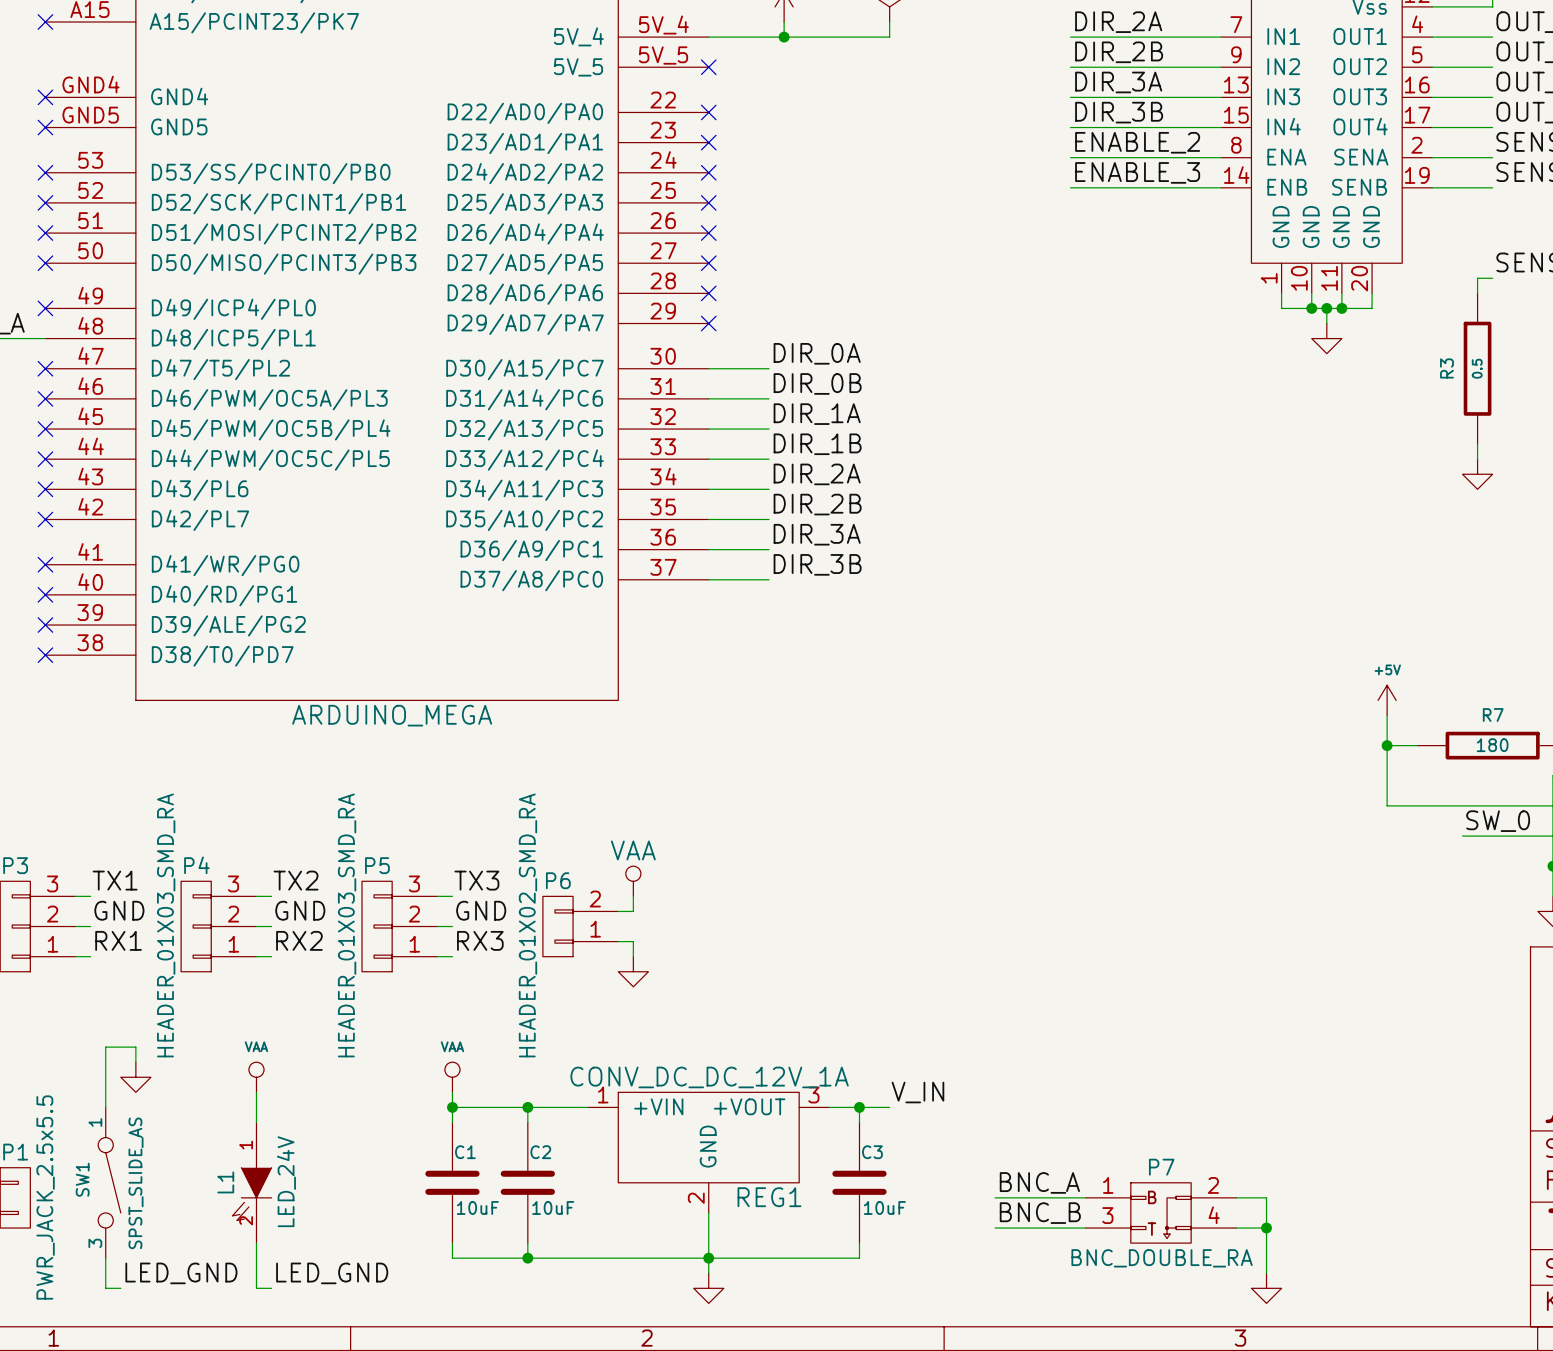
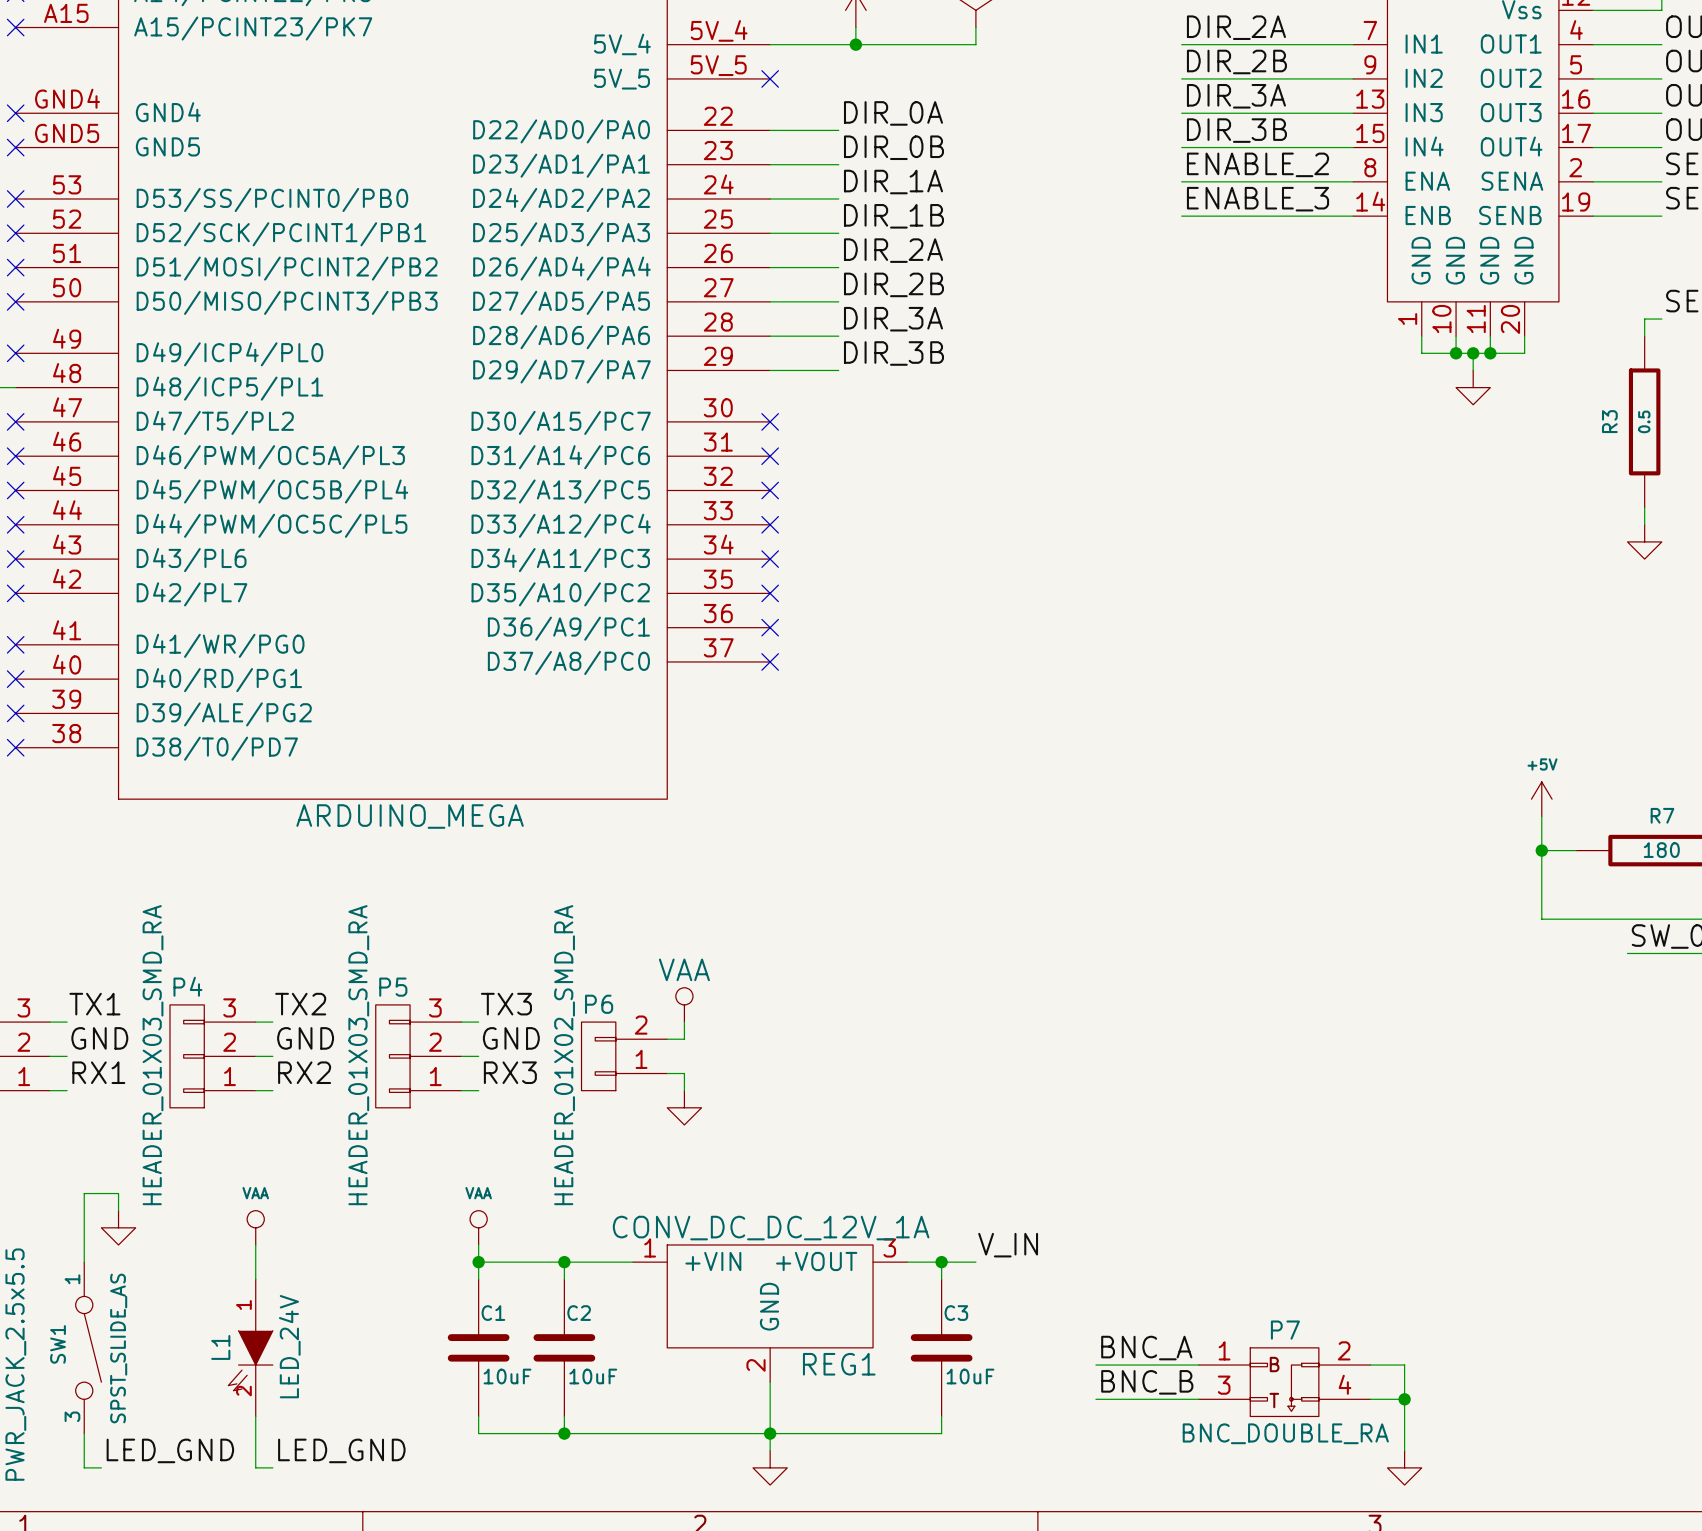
no-connect mark: (708, 112) -> none
no-connect mark: (708, 142) -> none
no-connect mark: (708, 172) -> none
no-connect mark: (708, 202) -> none
no-connect mark: (708, 233) -> none
no-connect mark: (708, 263) -> none
no-connect mark: (708, 293) -> none
no-connect mark: (708, 323) -> none
label position: DIR_0A (817, 353) -> DIR_0A (893, 113)
wire: (708, 368) (769, 368) -> (770, 130) (838, 130)
no-connect mark: none -> (770, 421)
label position: DIR_0B (817, 383) -> DIR_0B (893, 147)
wire: (708, 398) (769, 398) -> (770, 164) (838, 164)
no-connect mark: none -> (770, 456)
label position: DIR_1A (817, 414) -> DIR_1A (893, 182)
wire: (708, 429) (769, 429) -> (770, 198) (838, 198)
no-connect mark: none -> (770, 490)
label position: DIR_1B (817, 444) -> DIR_1B (893, 216)
wire: (708, 459) (769, 459) -> (770, 233) (838, 233)
no-connect mark: none -> (770, 524)
label position: DIR_2A (817, 474) -> DIR_2A (893, 250)
wire: (708, 489) (769, 489) -> (770, 267) (838, 267)
no-connect mark: none -> (770, 559)
label position: DIR_2B (817, 504) -> DIR_2B (893, 284)
wire: (708, 519) (769, 519) -> (770, 301) (838, 301)
no-connect mark: none -> (770, 593)
label position: DIR_3A (817, 534) -> DIR_3A (893, 319)
wire: (708, 549) (769, 549) -> (770, 336) (838, 336)
no-connect mark: none -> (770, 627)
label position: DIR_3B (817, 564) -> DIR_3B (893, 353)
wire: (708, 579) (769, 579) -> (770, 370) (838, 370)
no-connect mark: none -> (770, 661)

